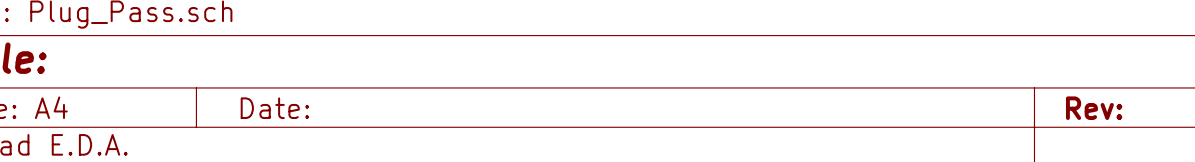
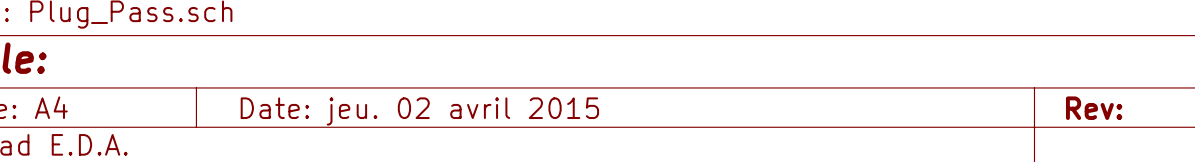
title block: Date: (274, 108) -> Date: jeu. 02 avril 2015 (419, 111)

